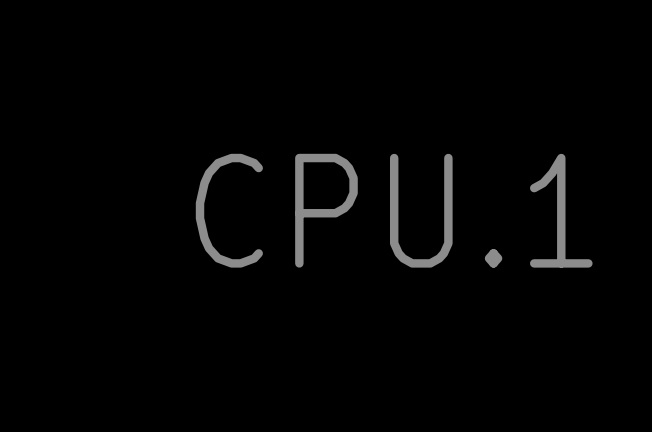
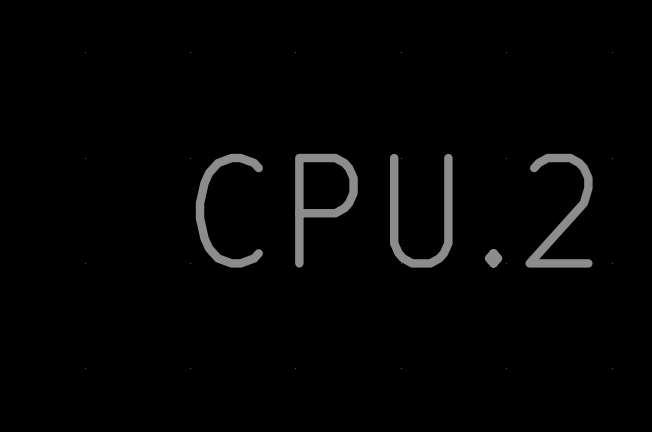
text: CPU.1 (394, 210) -> CPU.2 (394, 210)

